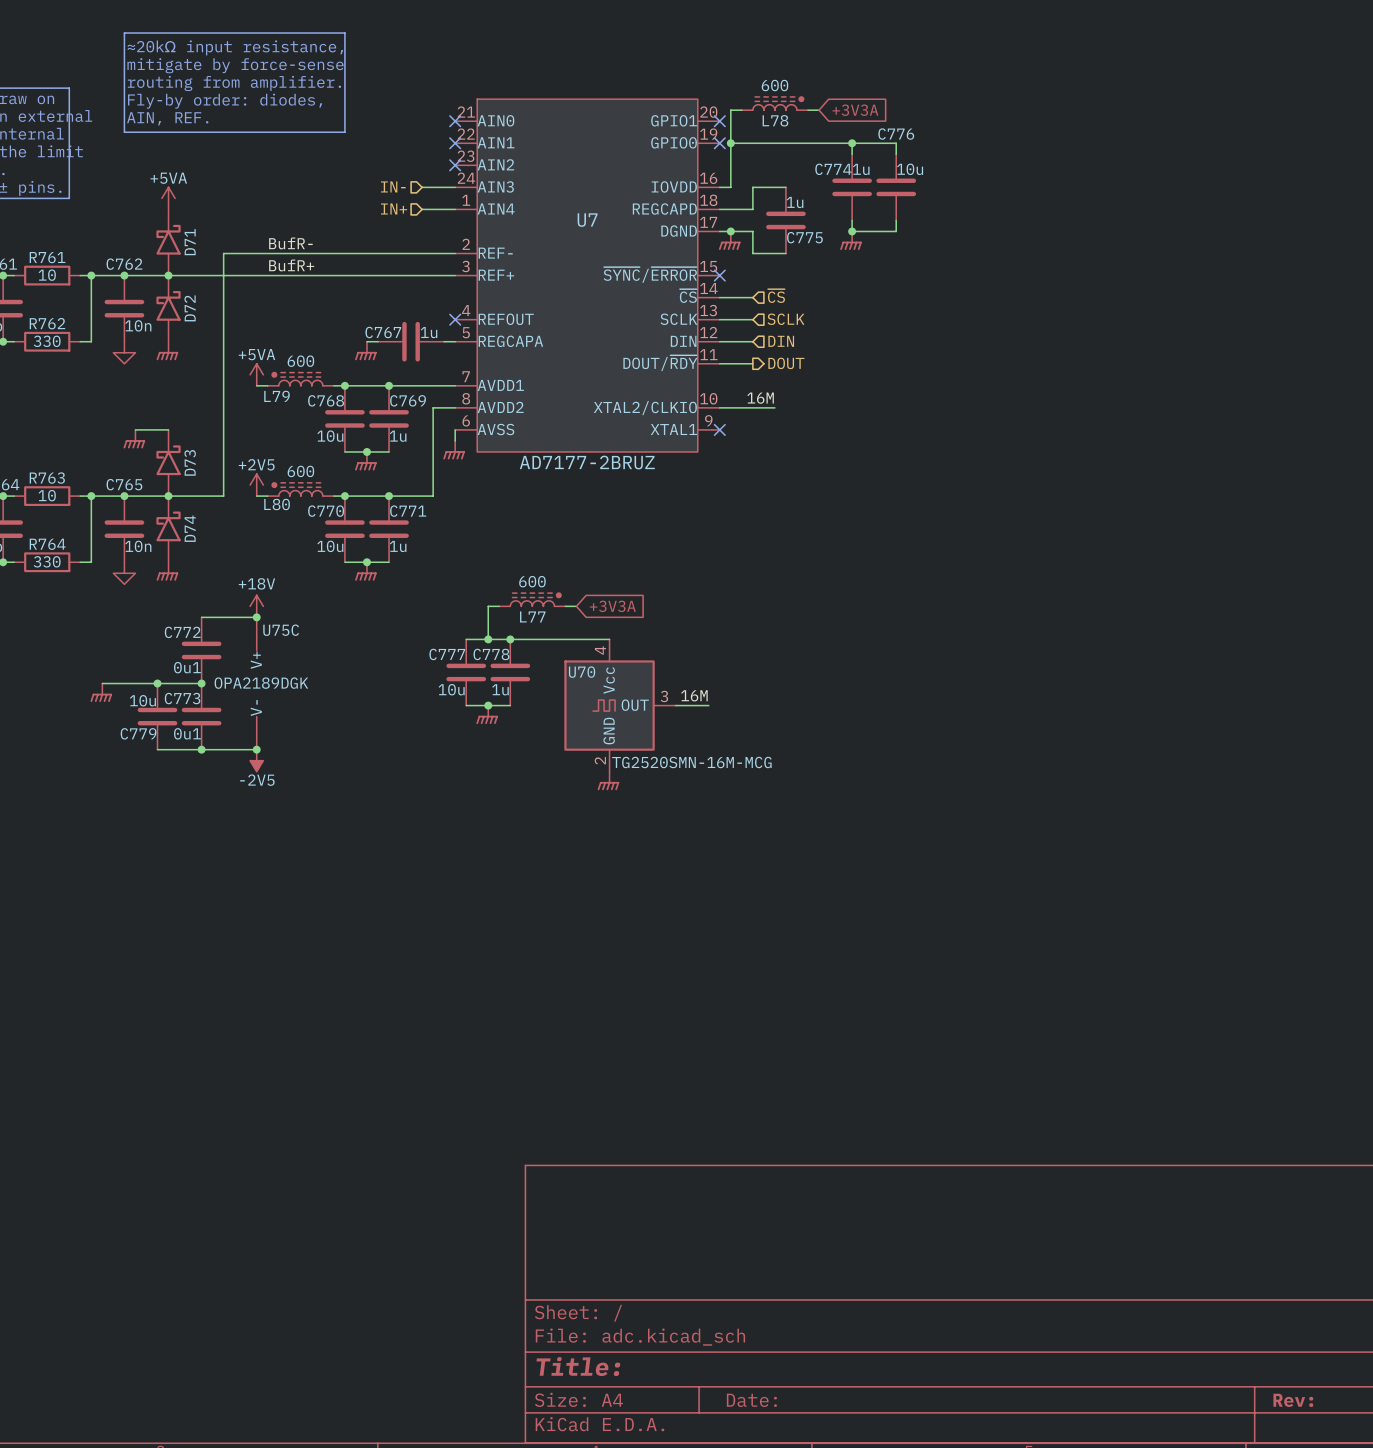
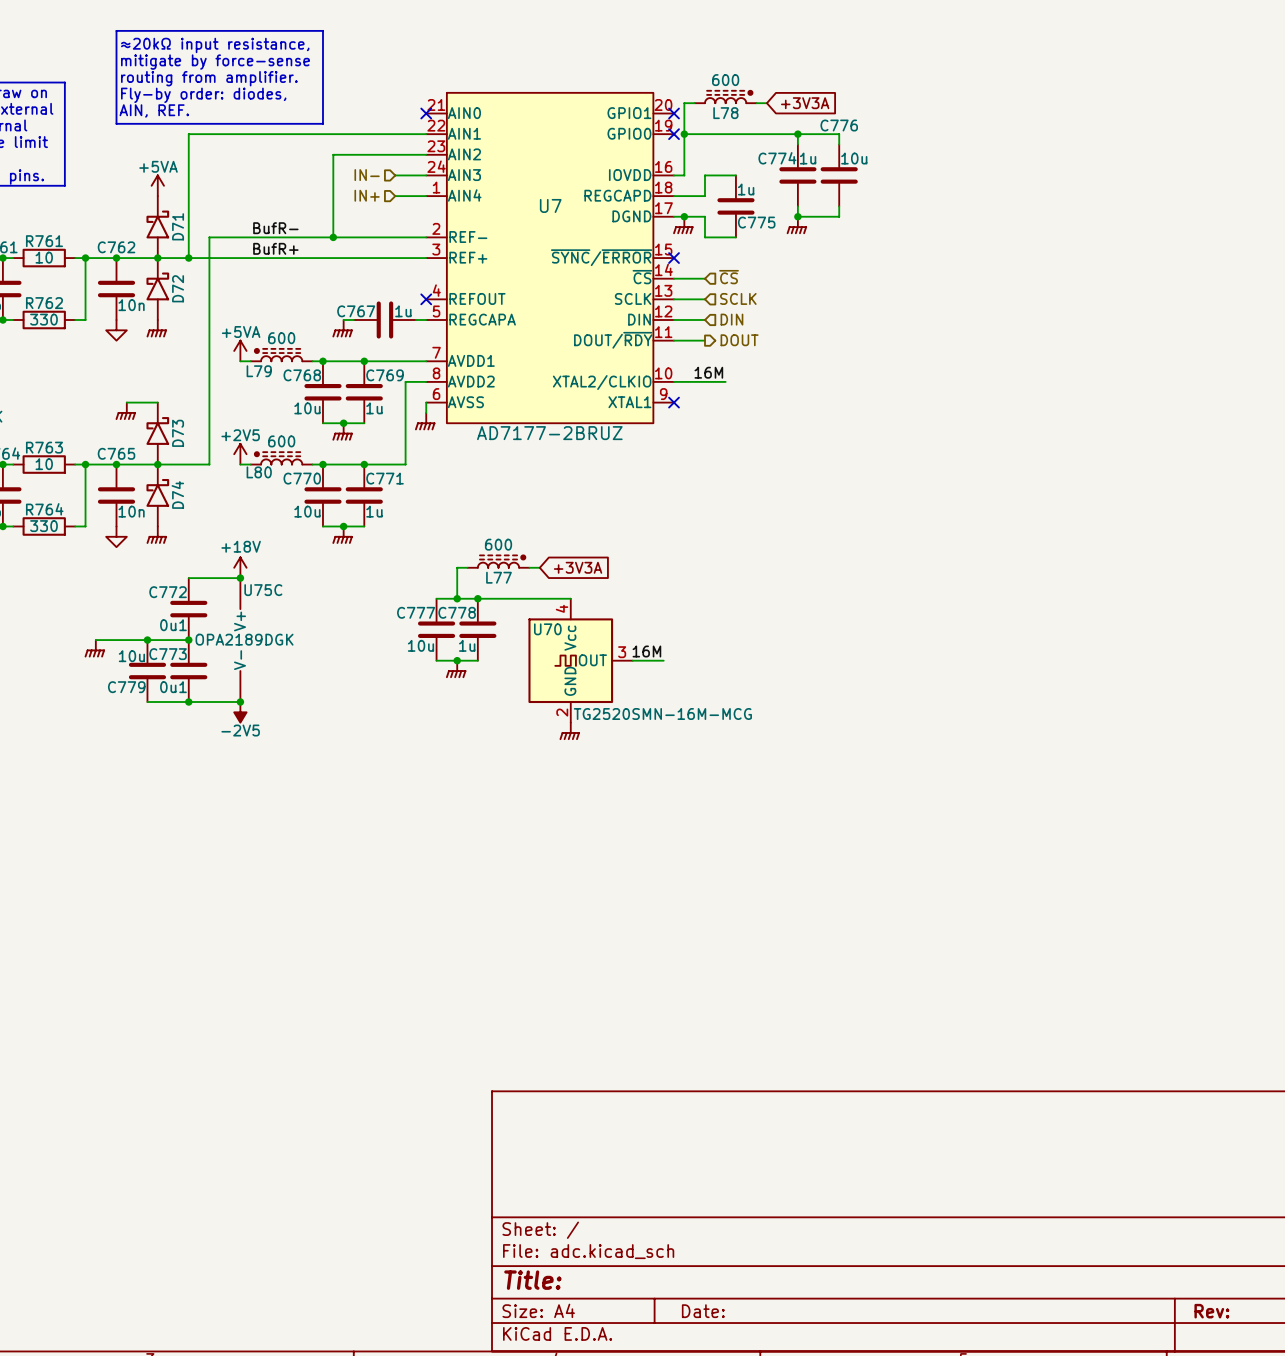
wire: none -> (426, 134) (188, 134) (188, 258)
no-connect mark: (455, 143) -> none
wire: none -> (426, 154) (333, 154) (333, 237)
no-connect mark: (455, 165) -> none
junction: none -> (333, 237)
junction: none -> (188, 258)

